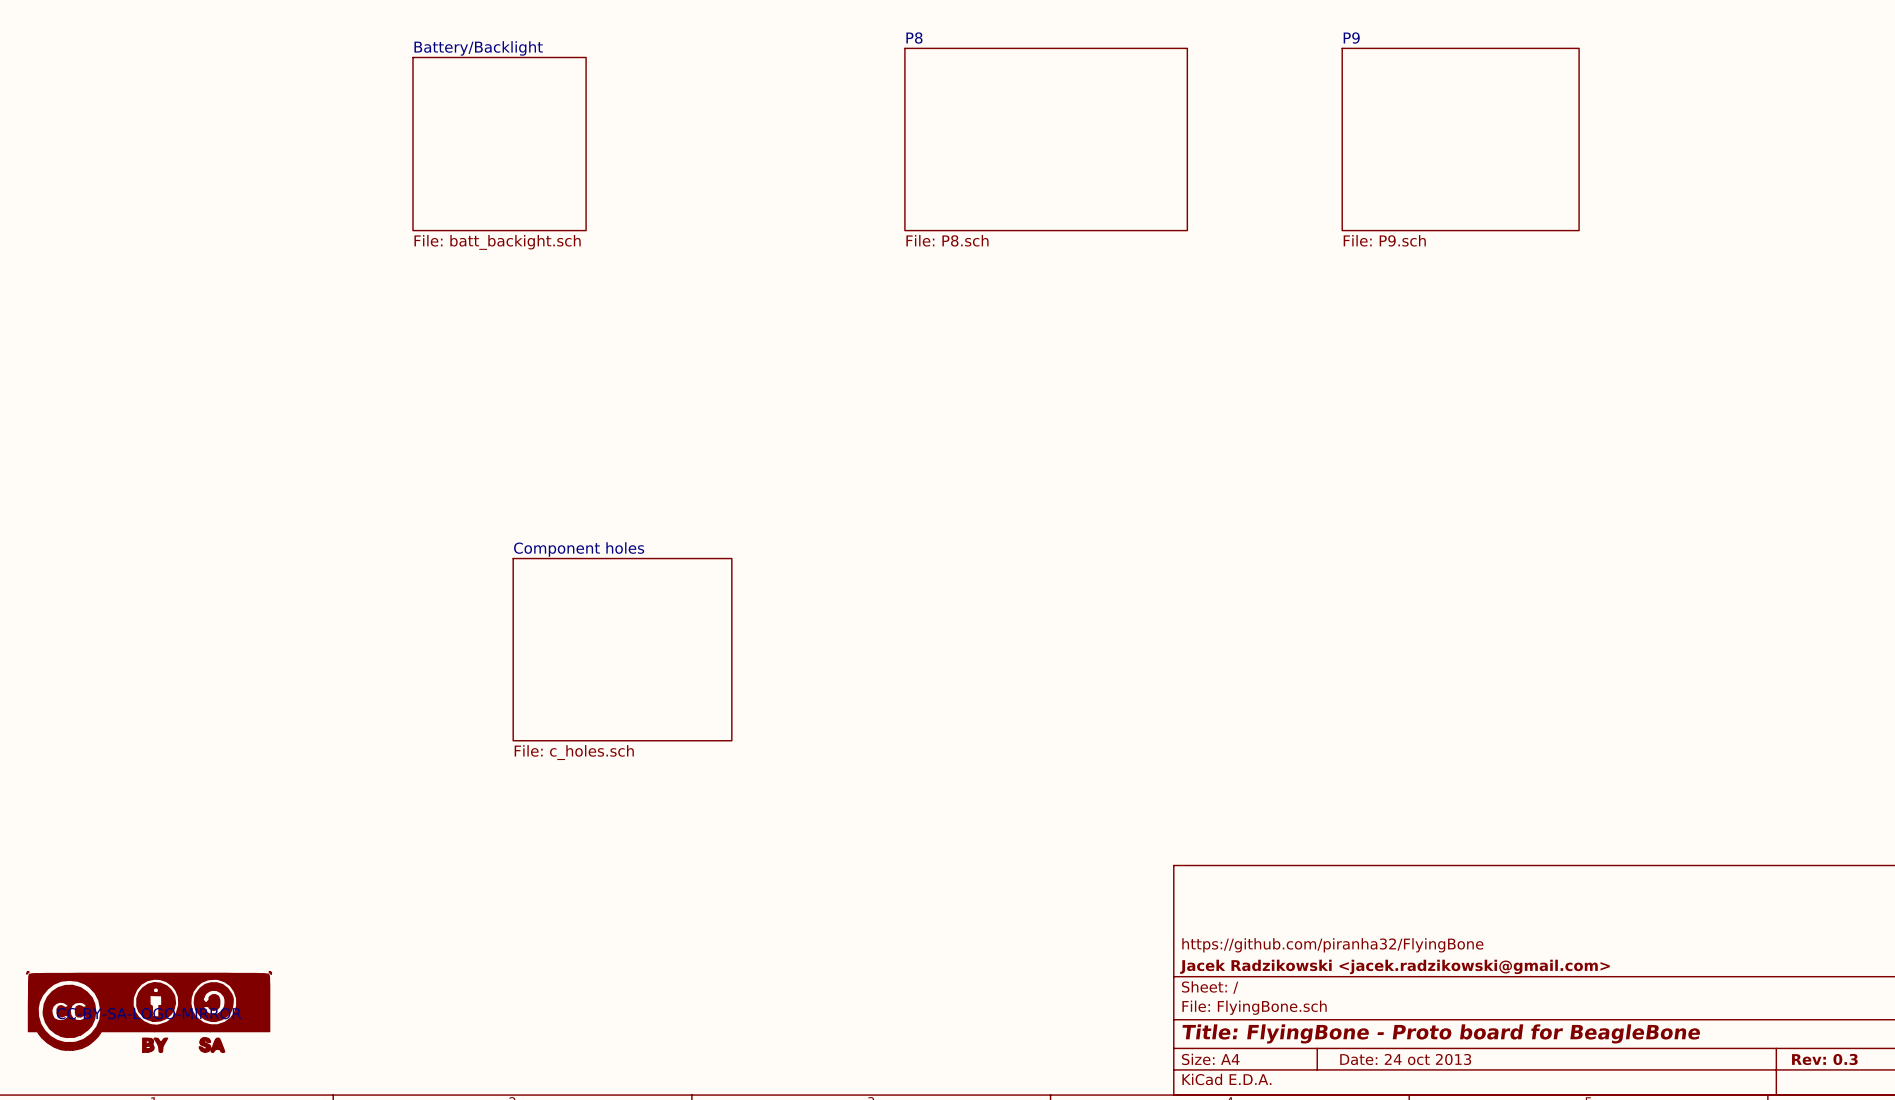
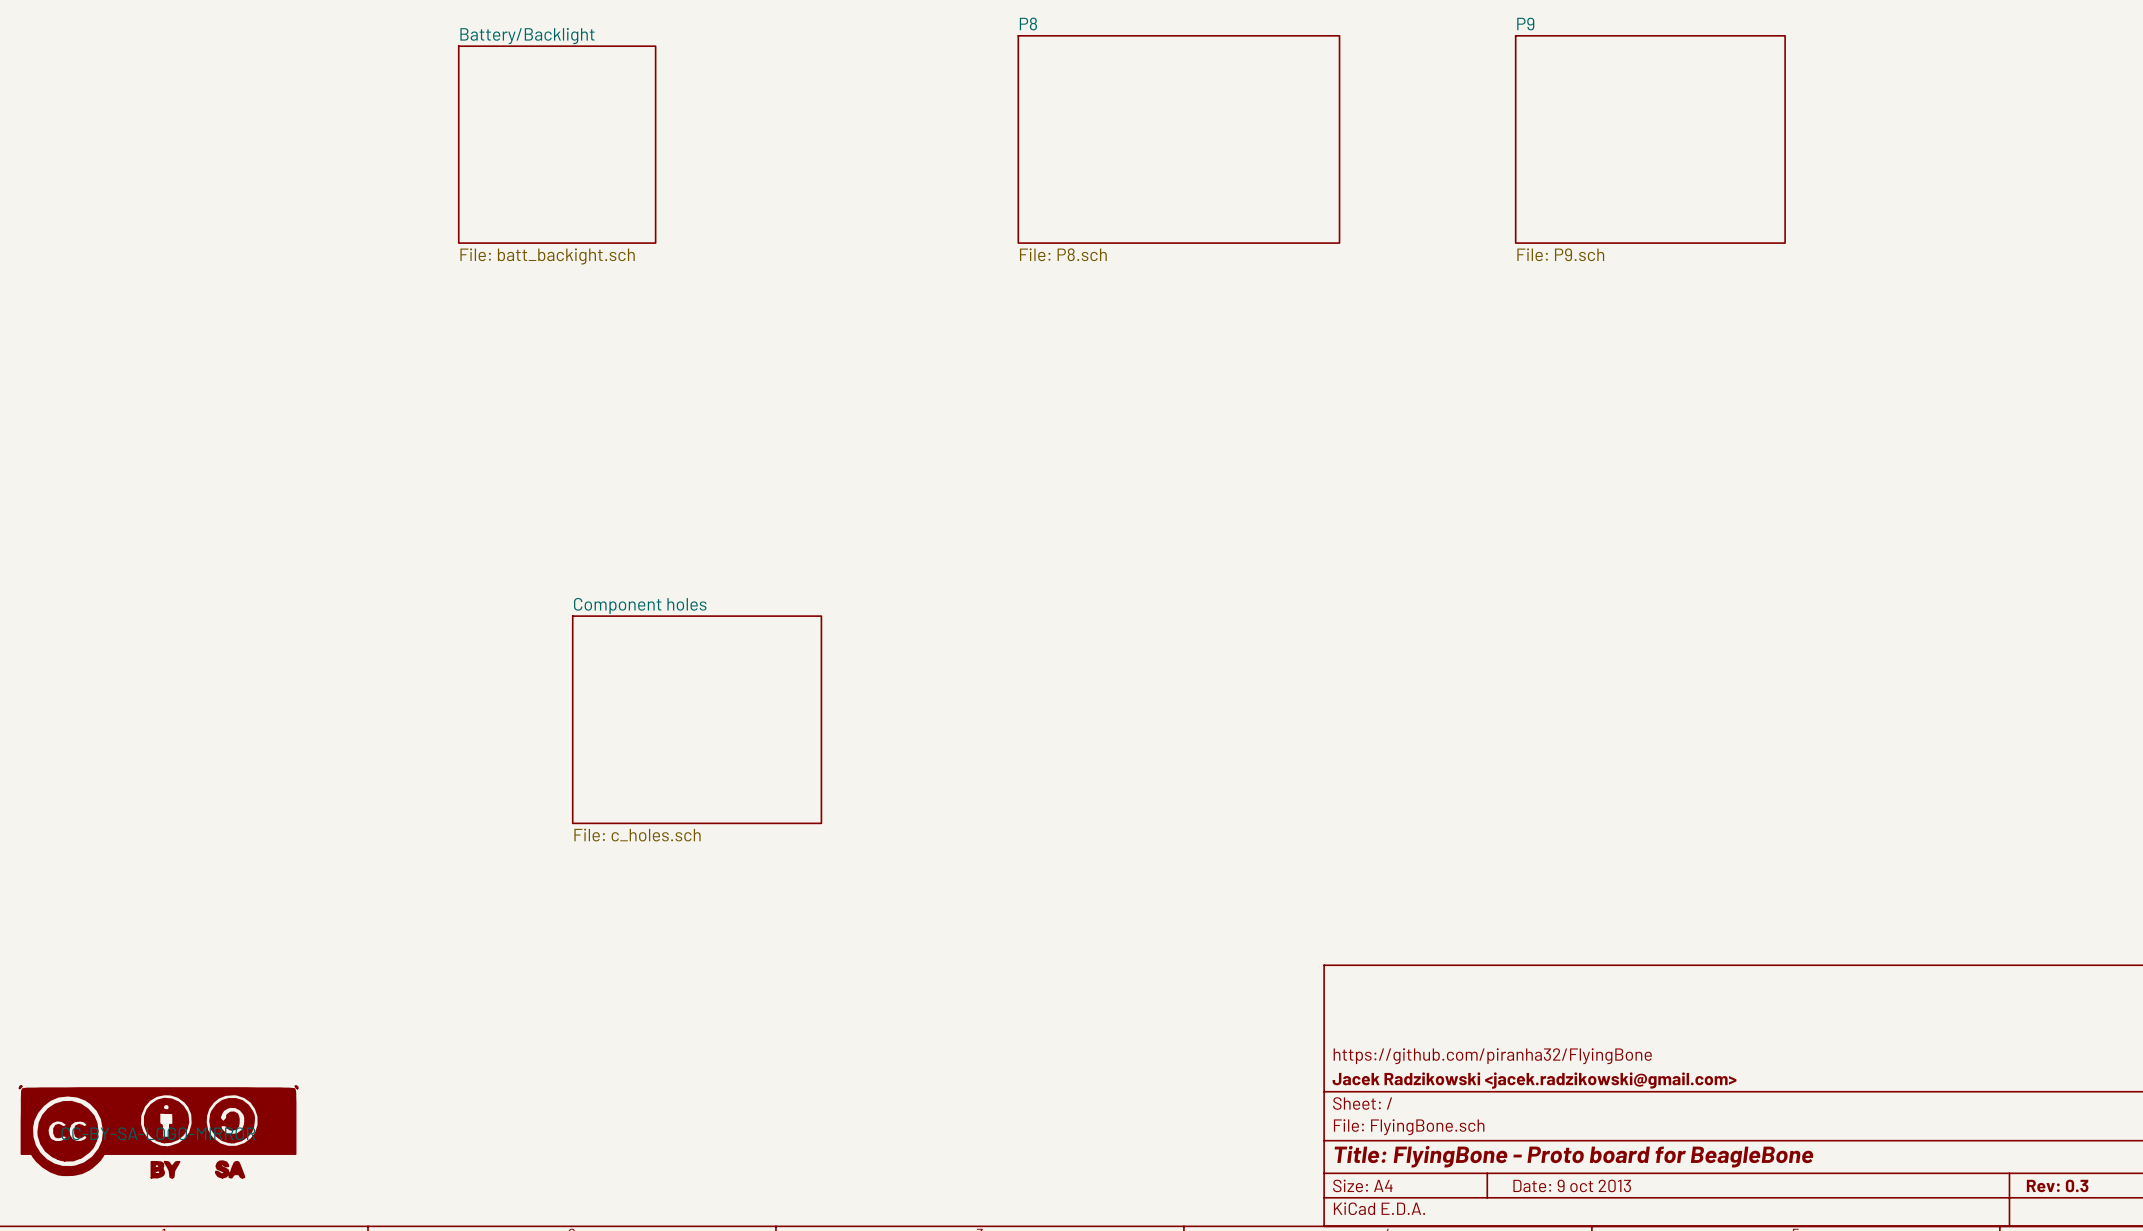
title block: Date: 24 oct 2013 (1405, 1059) -> Date: 9 oct 2013 (1572, 1185)

